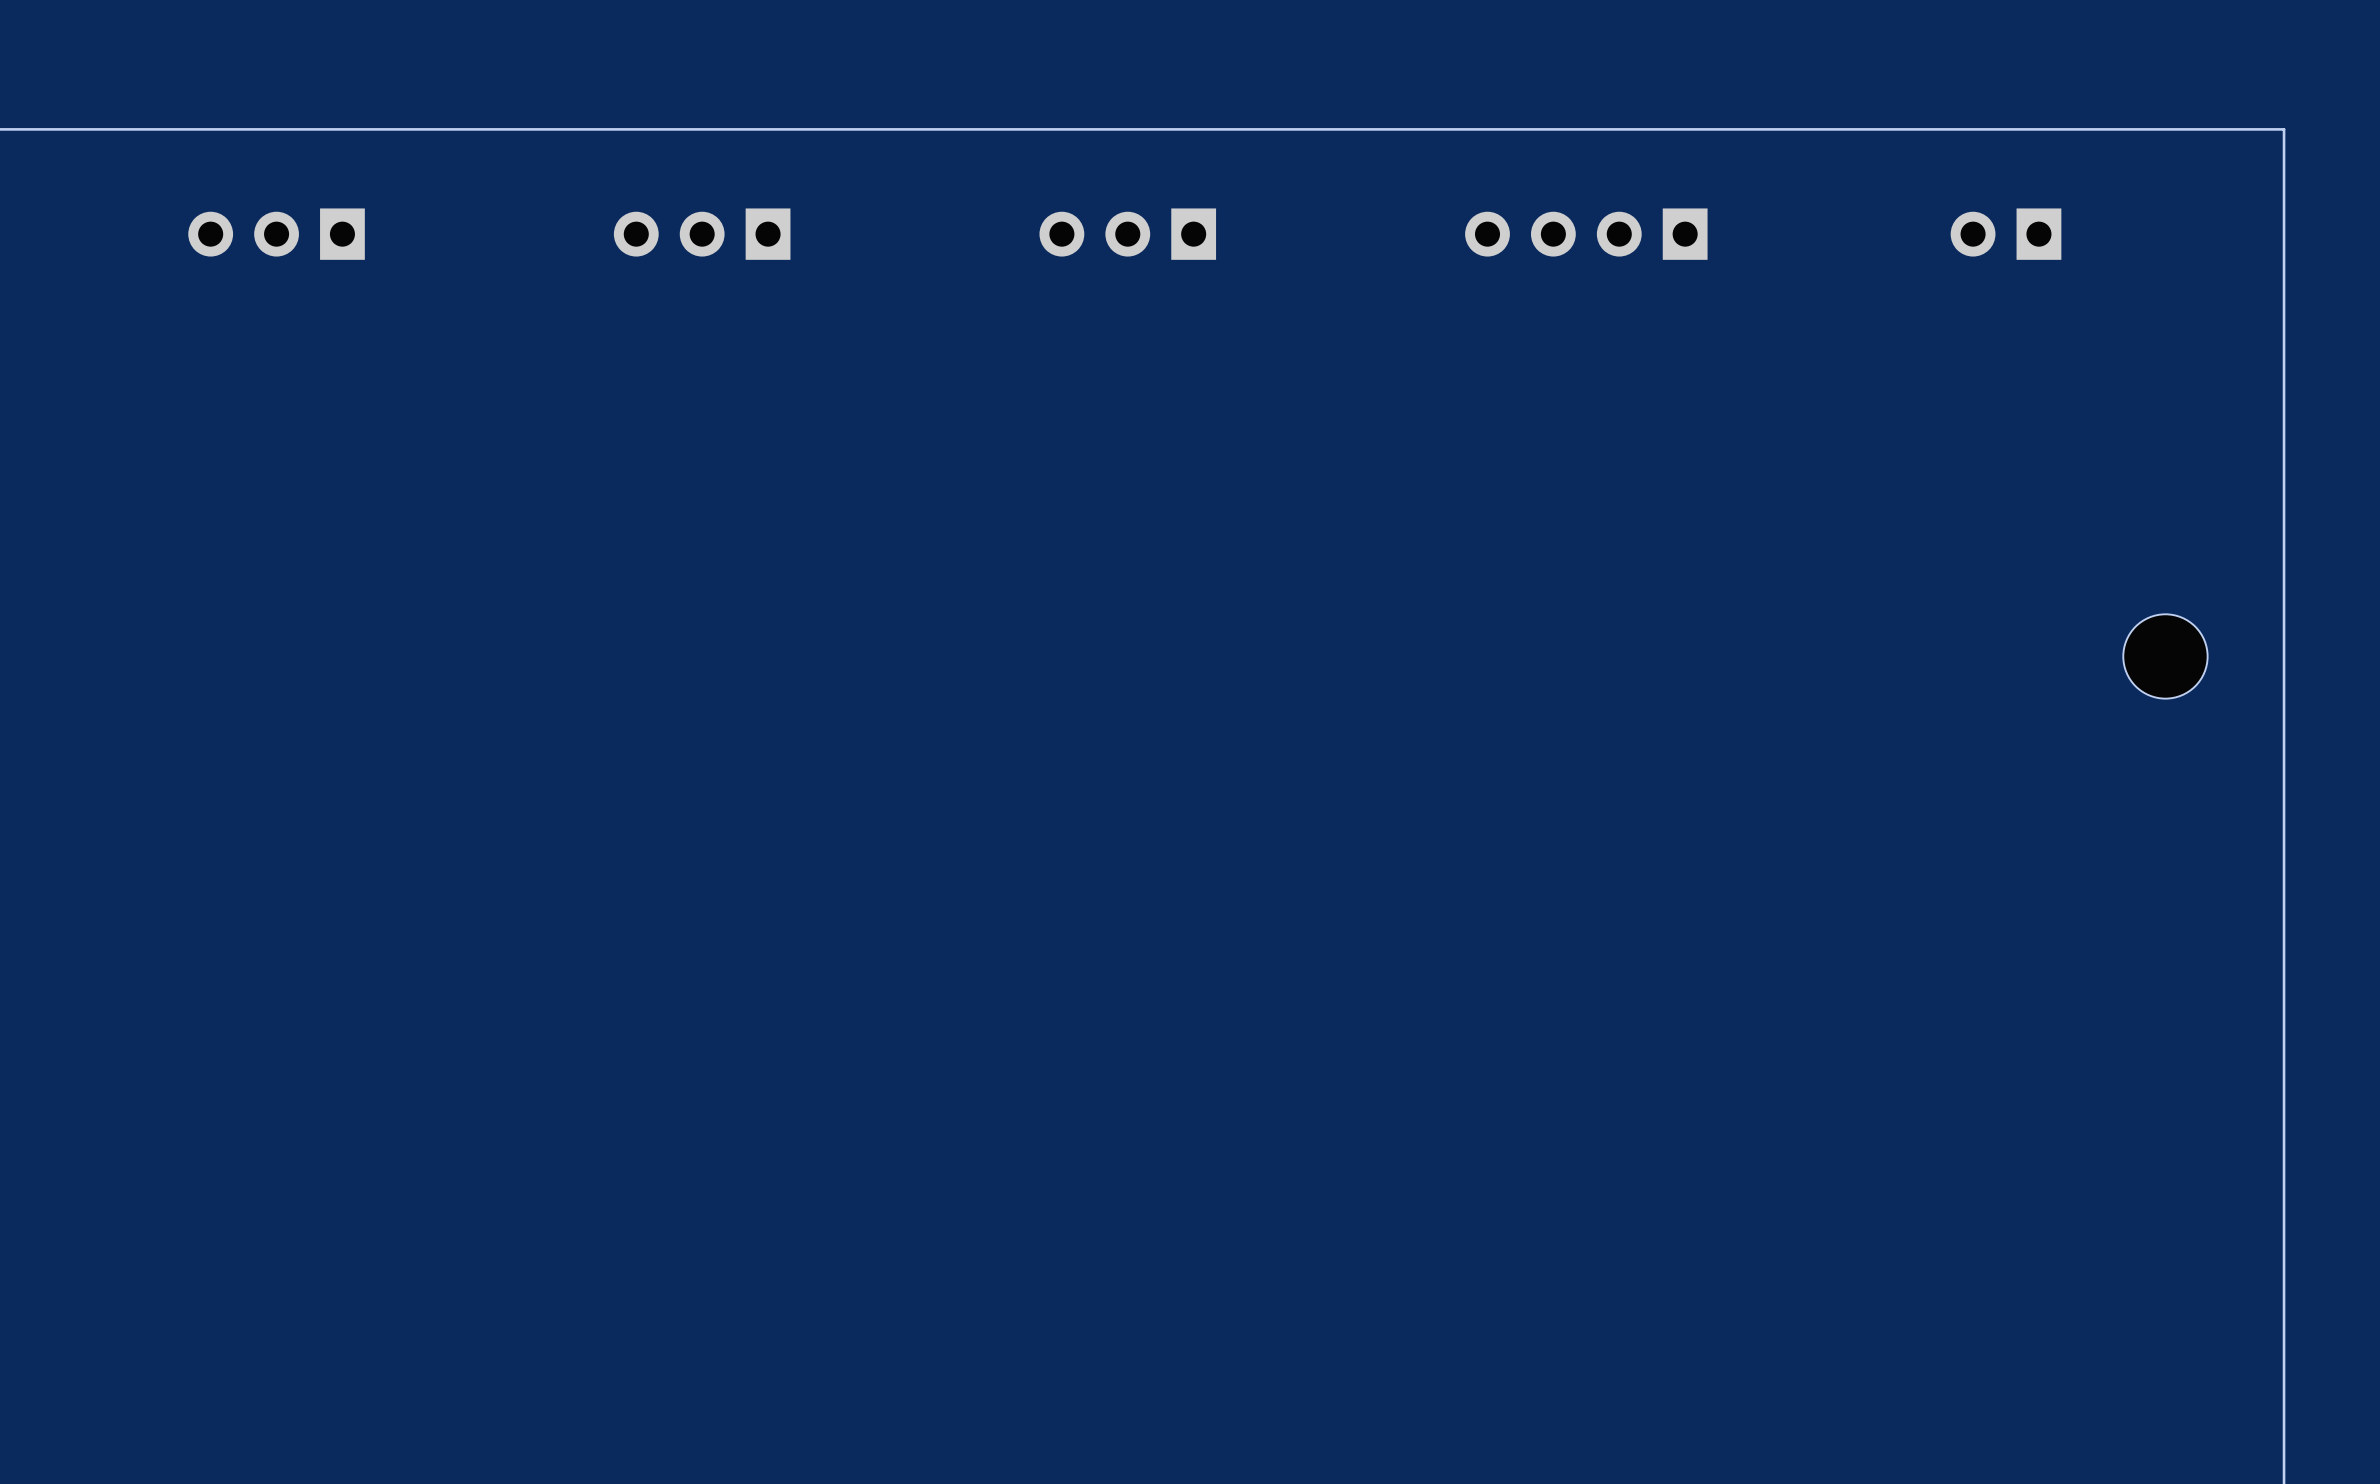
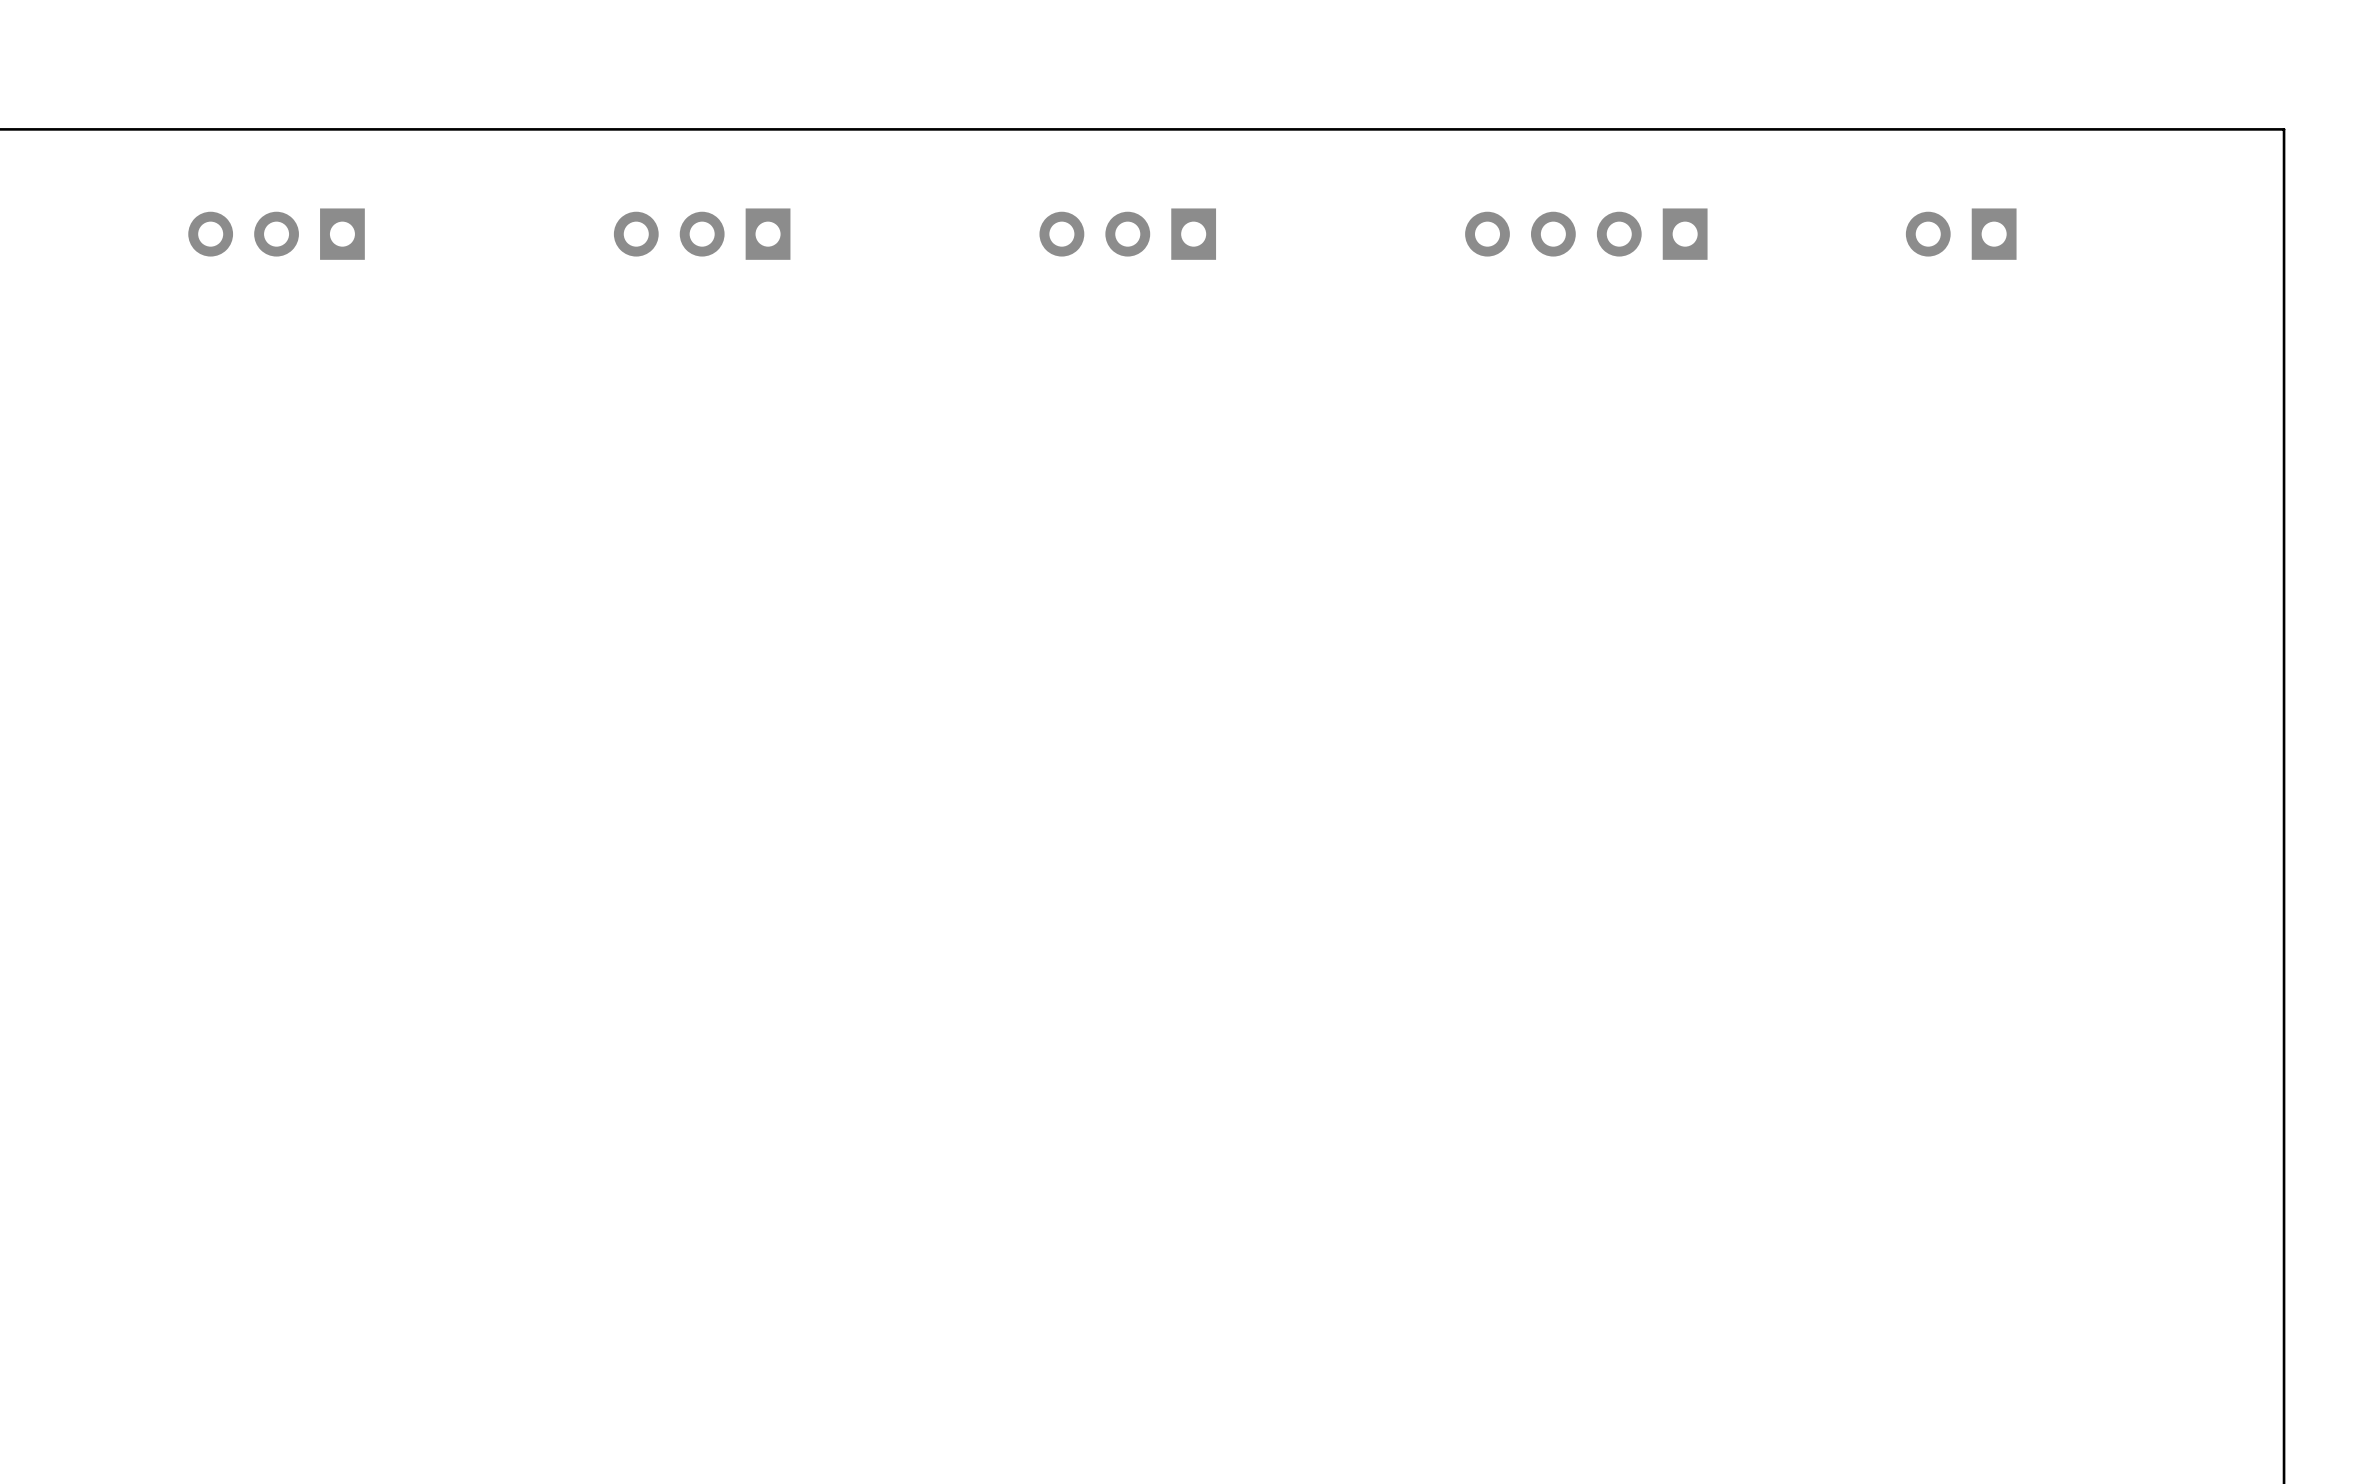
part position: (2006, 234) -> (1961, 234)
part: (2165, 656) -> none

